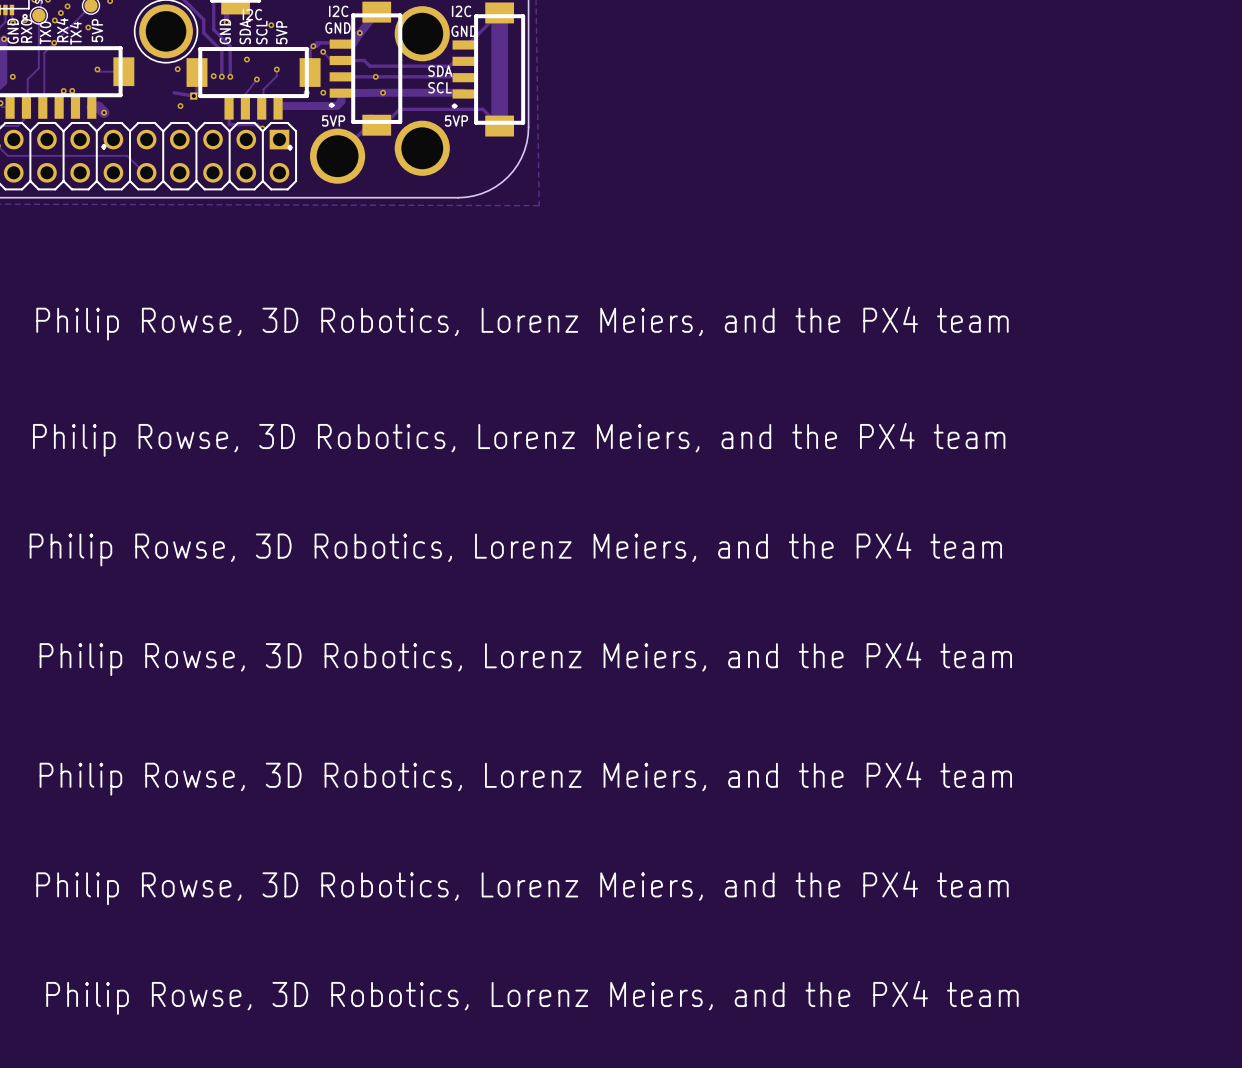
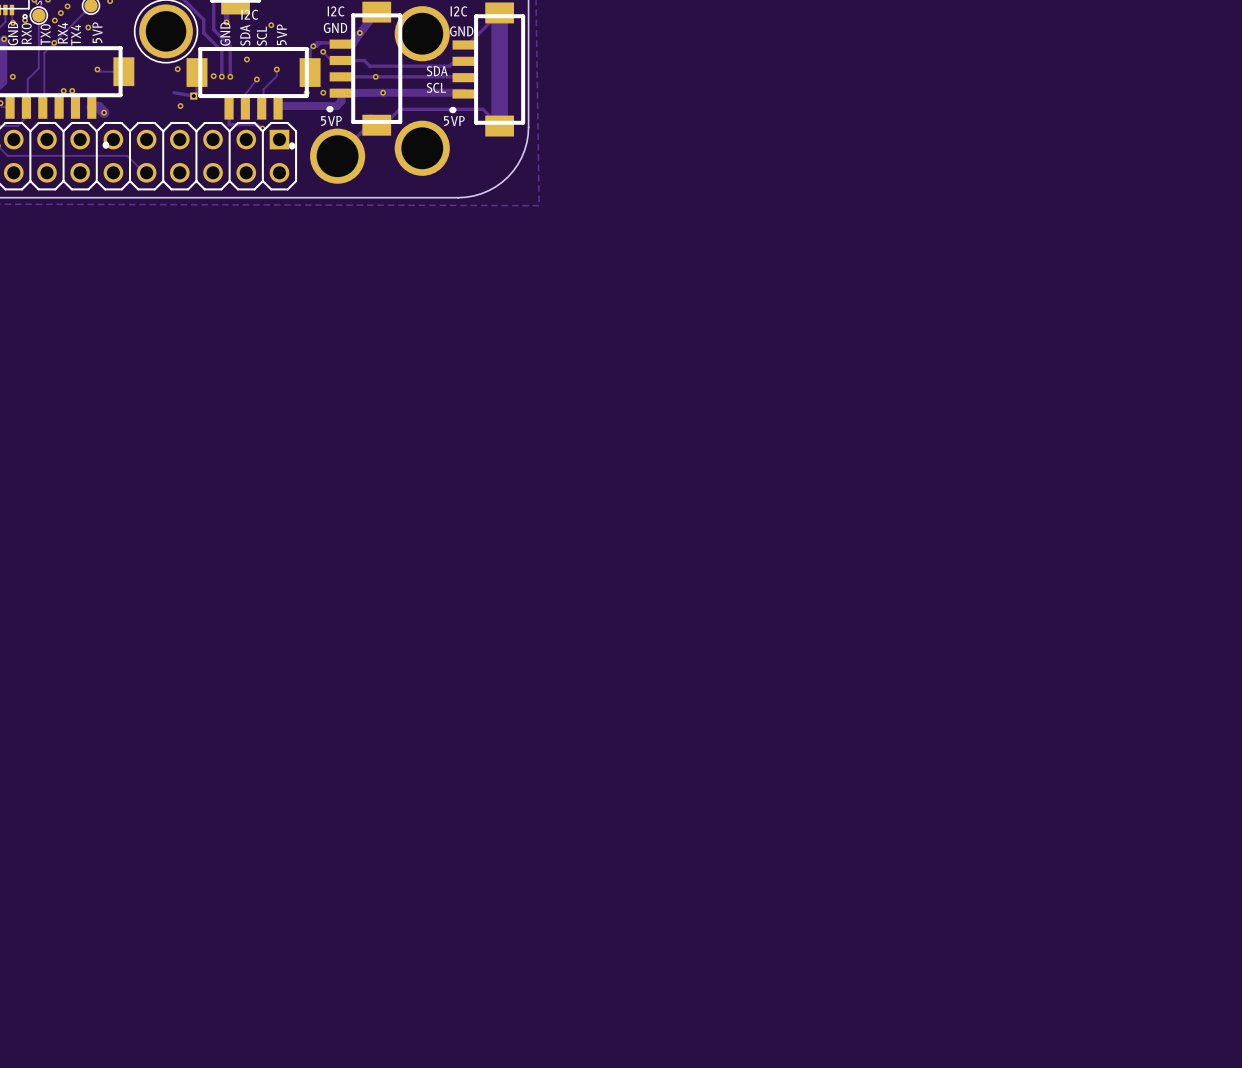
text: Philip Rowse, 3D Robotics, Lorenz Meiers, and the PX4 team (522, 323) -> none
text: Philip Rowse, 3D Robotics, Lorenz Meiers, and the PX4 team (519, 439) -> none
text: Philip Rowse, 3D Robotics, Lorenz Meiers, and the PX4 team (515, 549) -> none
text: Philip Rowse, 3D Robotics, Lorenz Meiers, and the PX4 team (525, 659) -> none
text: Philip Rowse, 3D Robotics, Lorenz Meiers, and the PX4 team (525, 778) -> none
text: Philip Rowse, 3D Robotics, Lorenz Meiers, and the PX4 team (522, 888) -> none
text: Philip Rowse, 3D Robotics, Lorenz Meiers, and the PX4 team (532, 997) -> none

